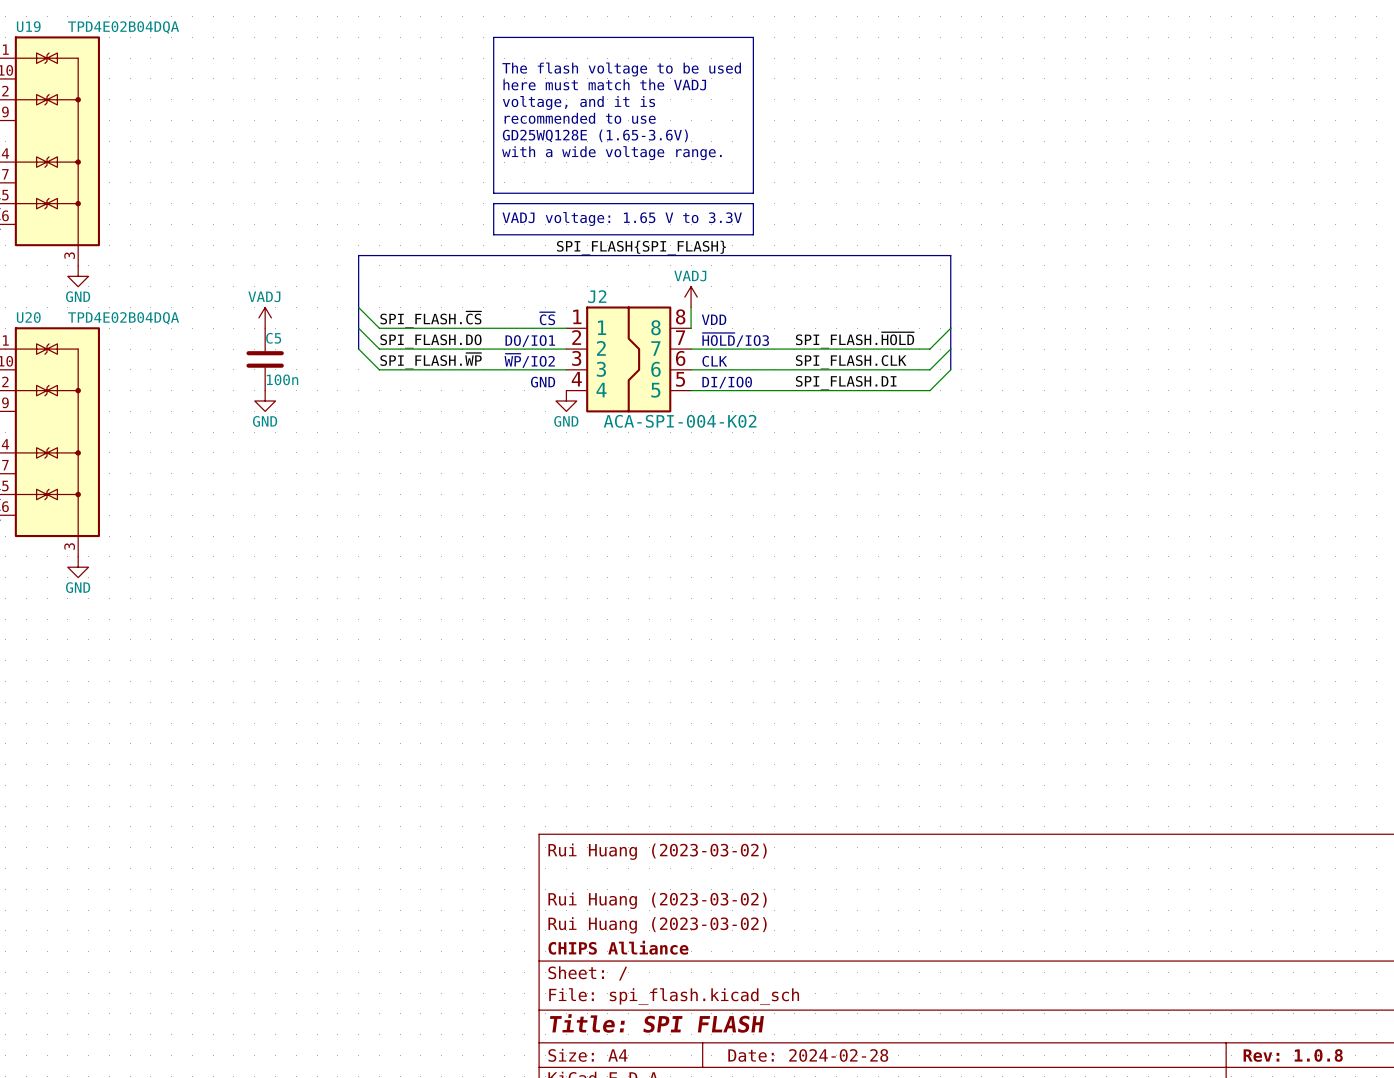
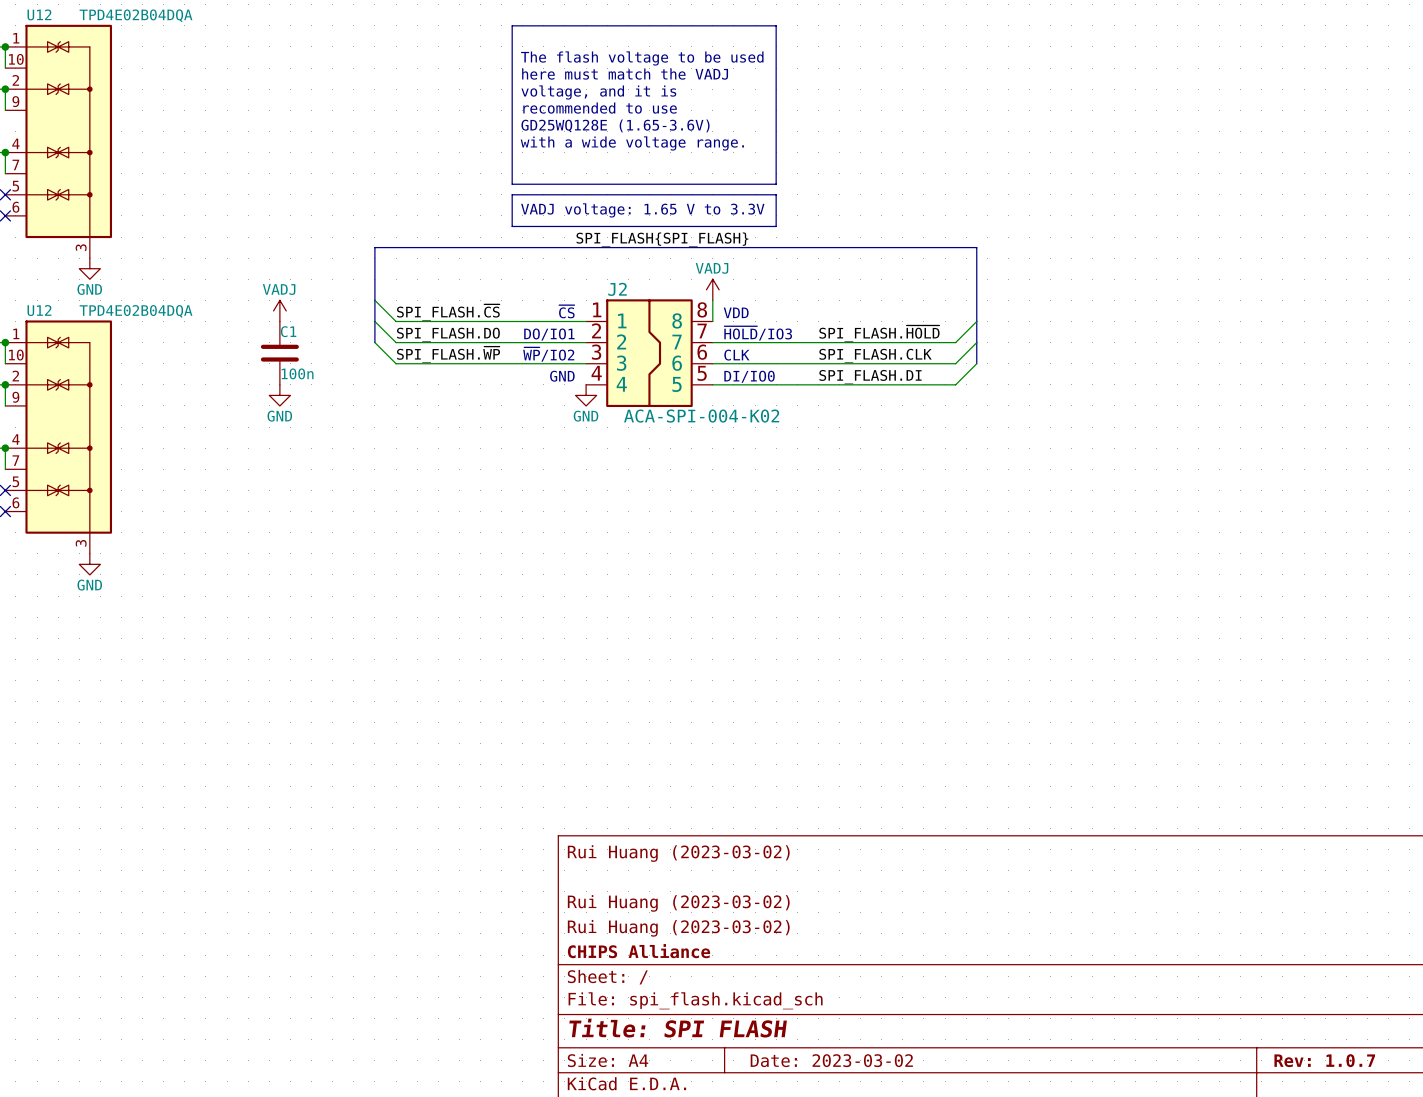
U19 name: U19 (28, 26) -> U12 (39, 14)
U20 name: U20 (28, 317) -> U12 (39, 310)
C5 name: C5 (273, 338) -> C1 (288, 331)
title block: Date: 2024-02-28 (808, 1055) -> Date: 2023-03-02 (831, 1060)
title block: Rev: 1.0.8 (1293, 1055) -> Rev: 1.0.7 (1324, 1060)

